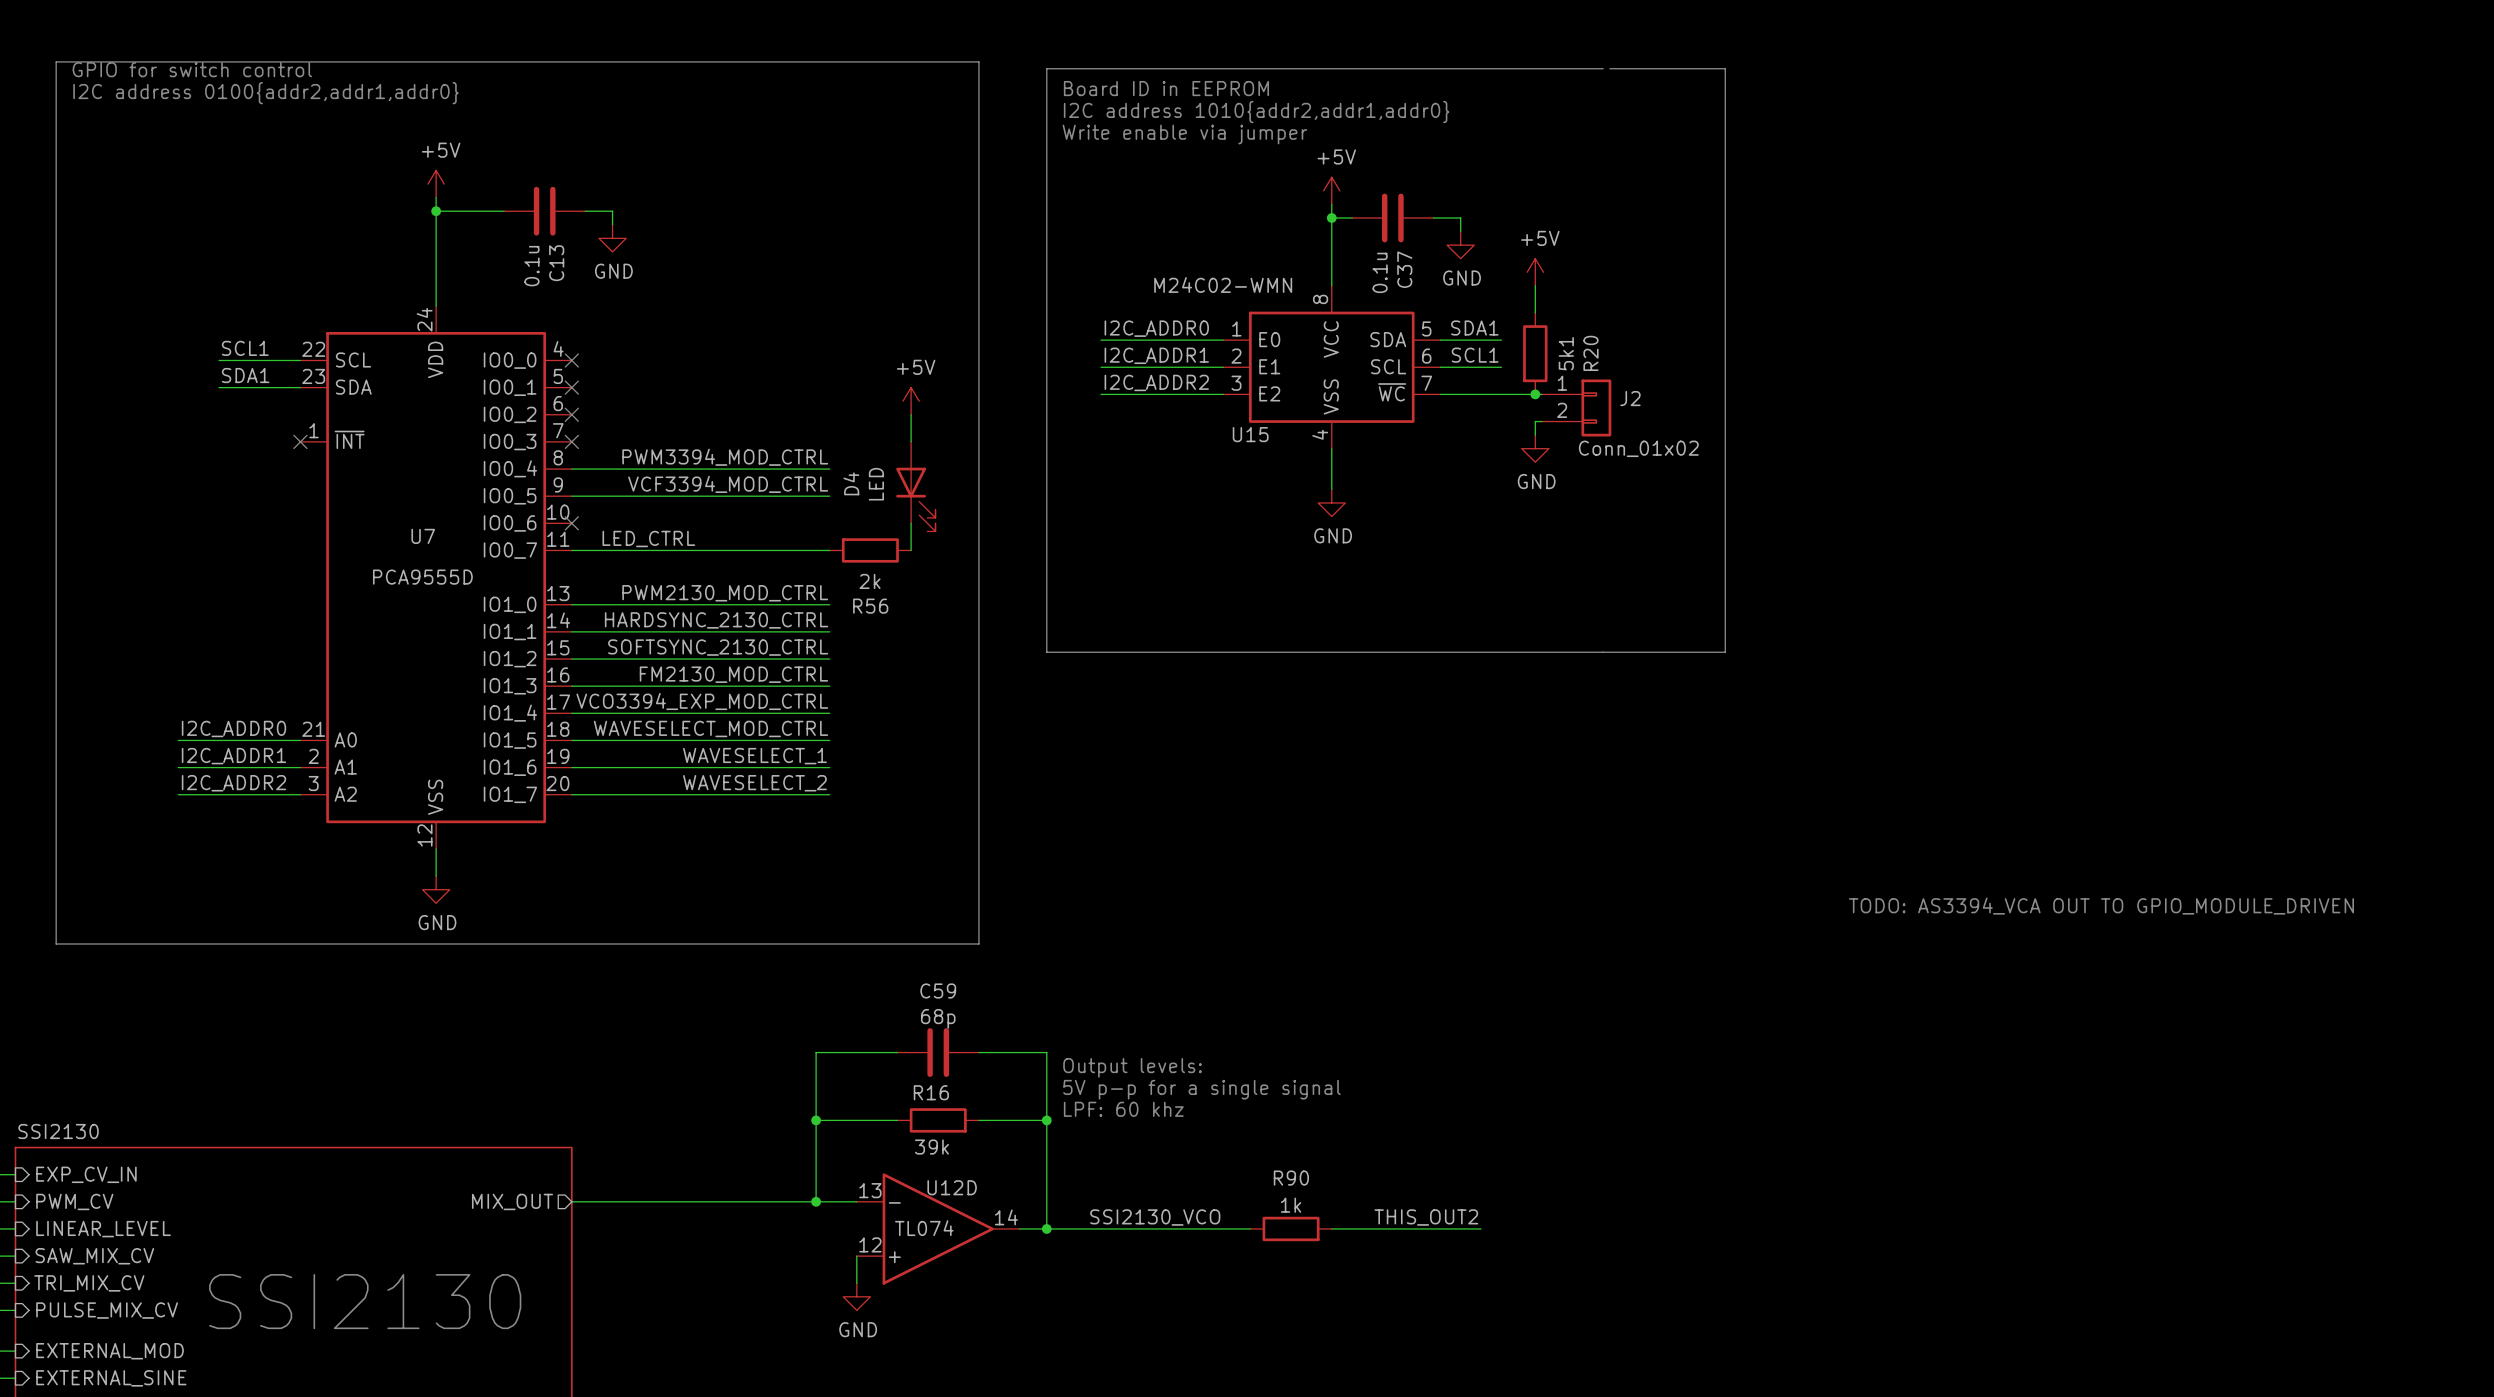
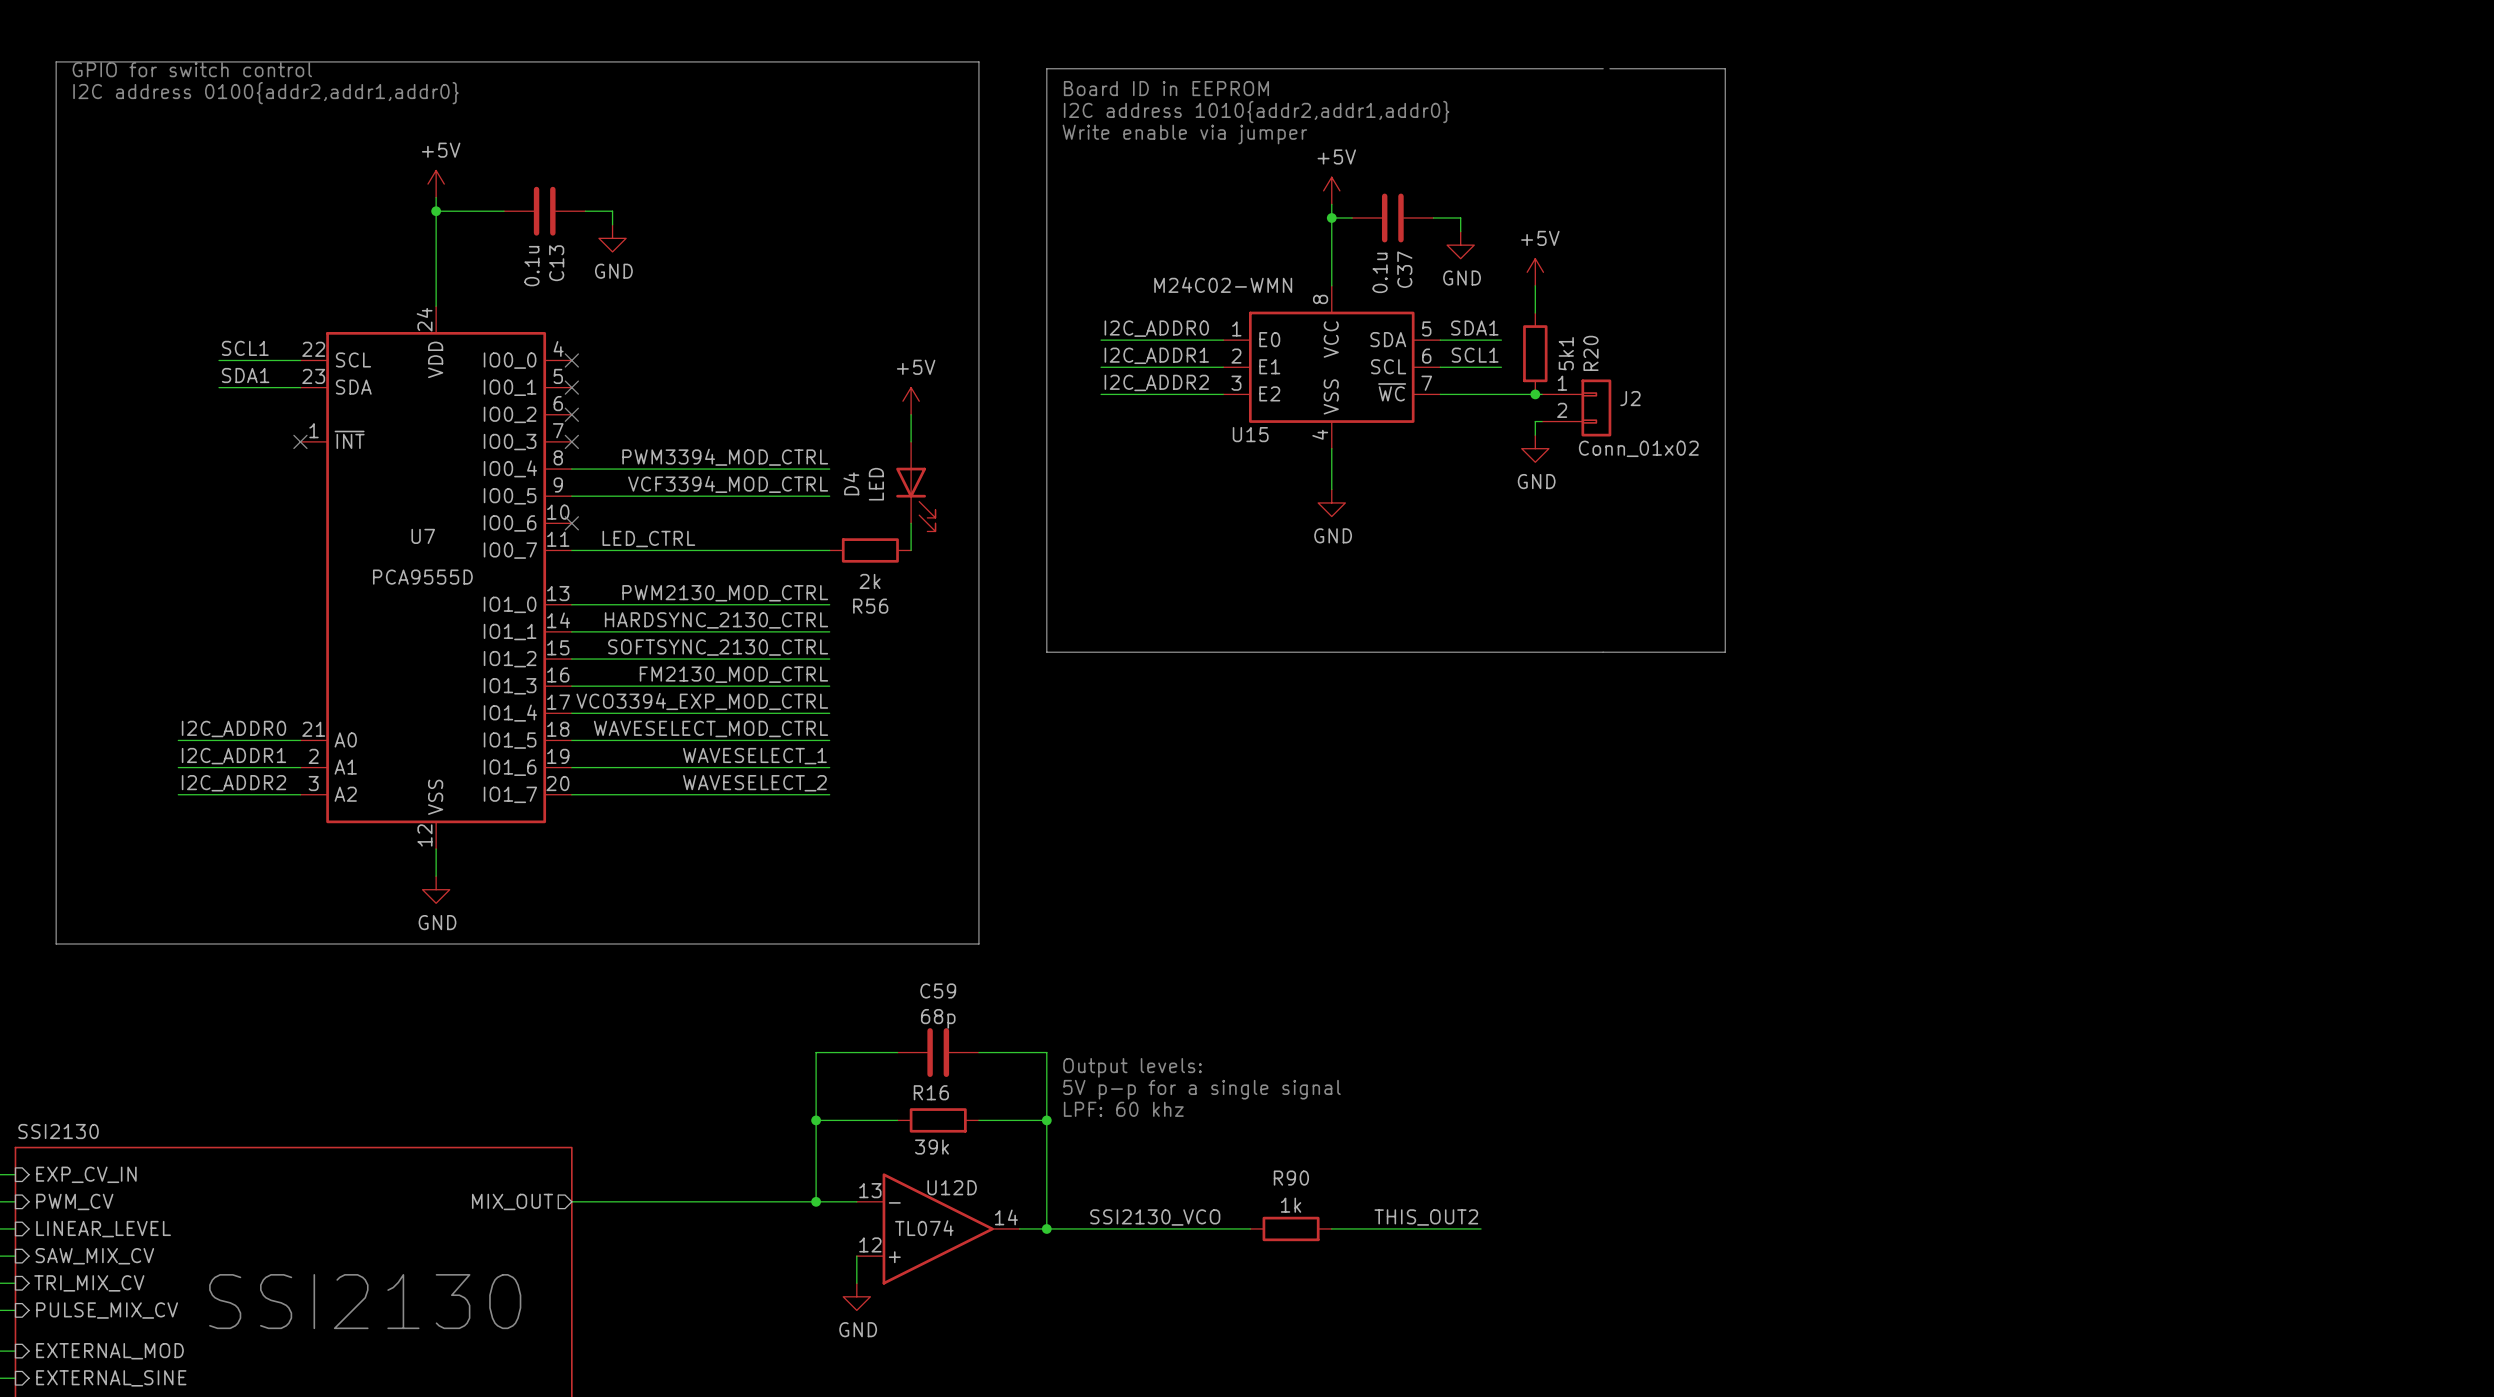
text: TODO: AS3394_VCA OUT TO GPIO_MODULE_DRIVEN (2101, 906) -> none

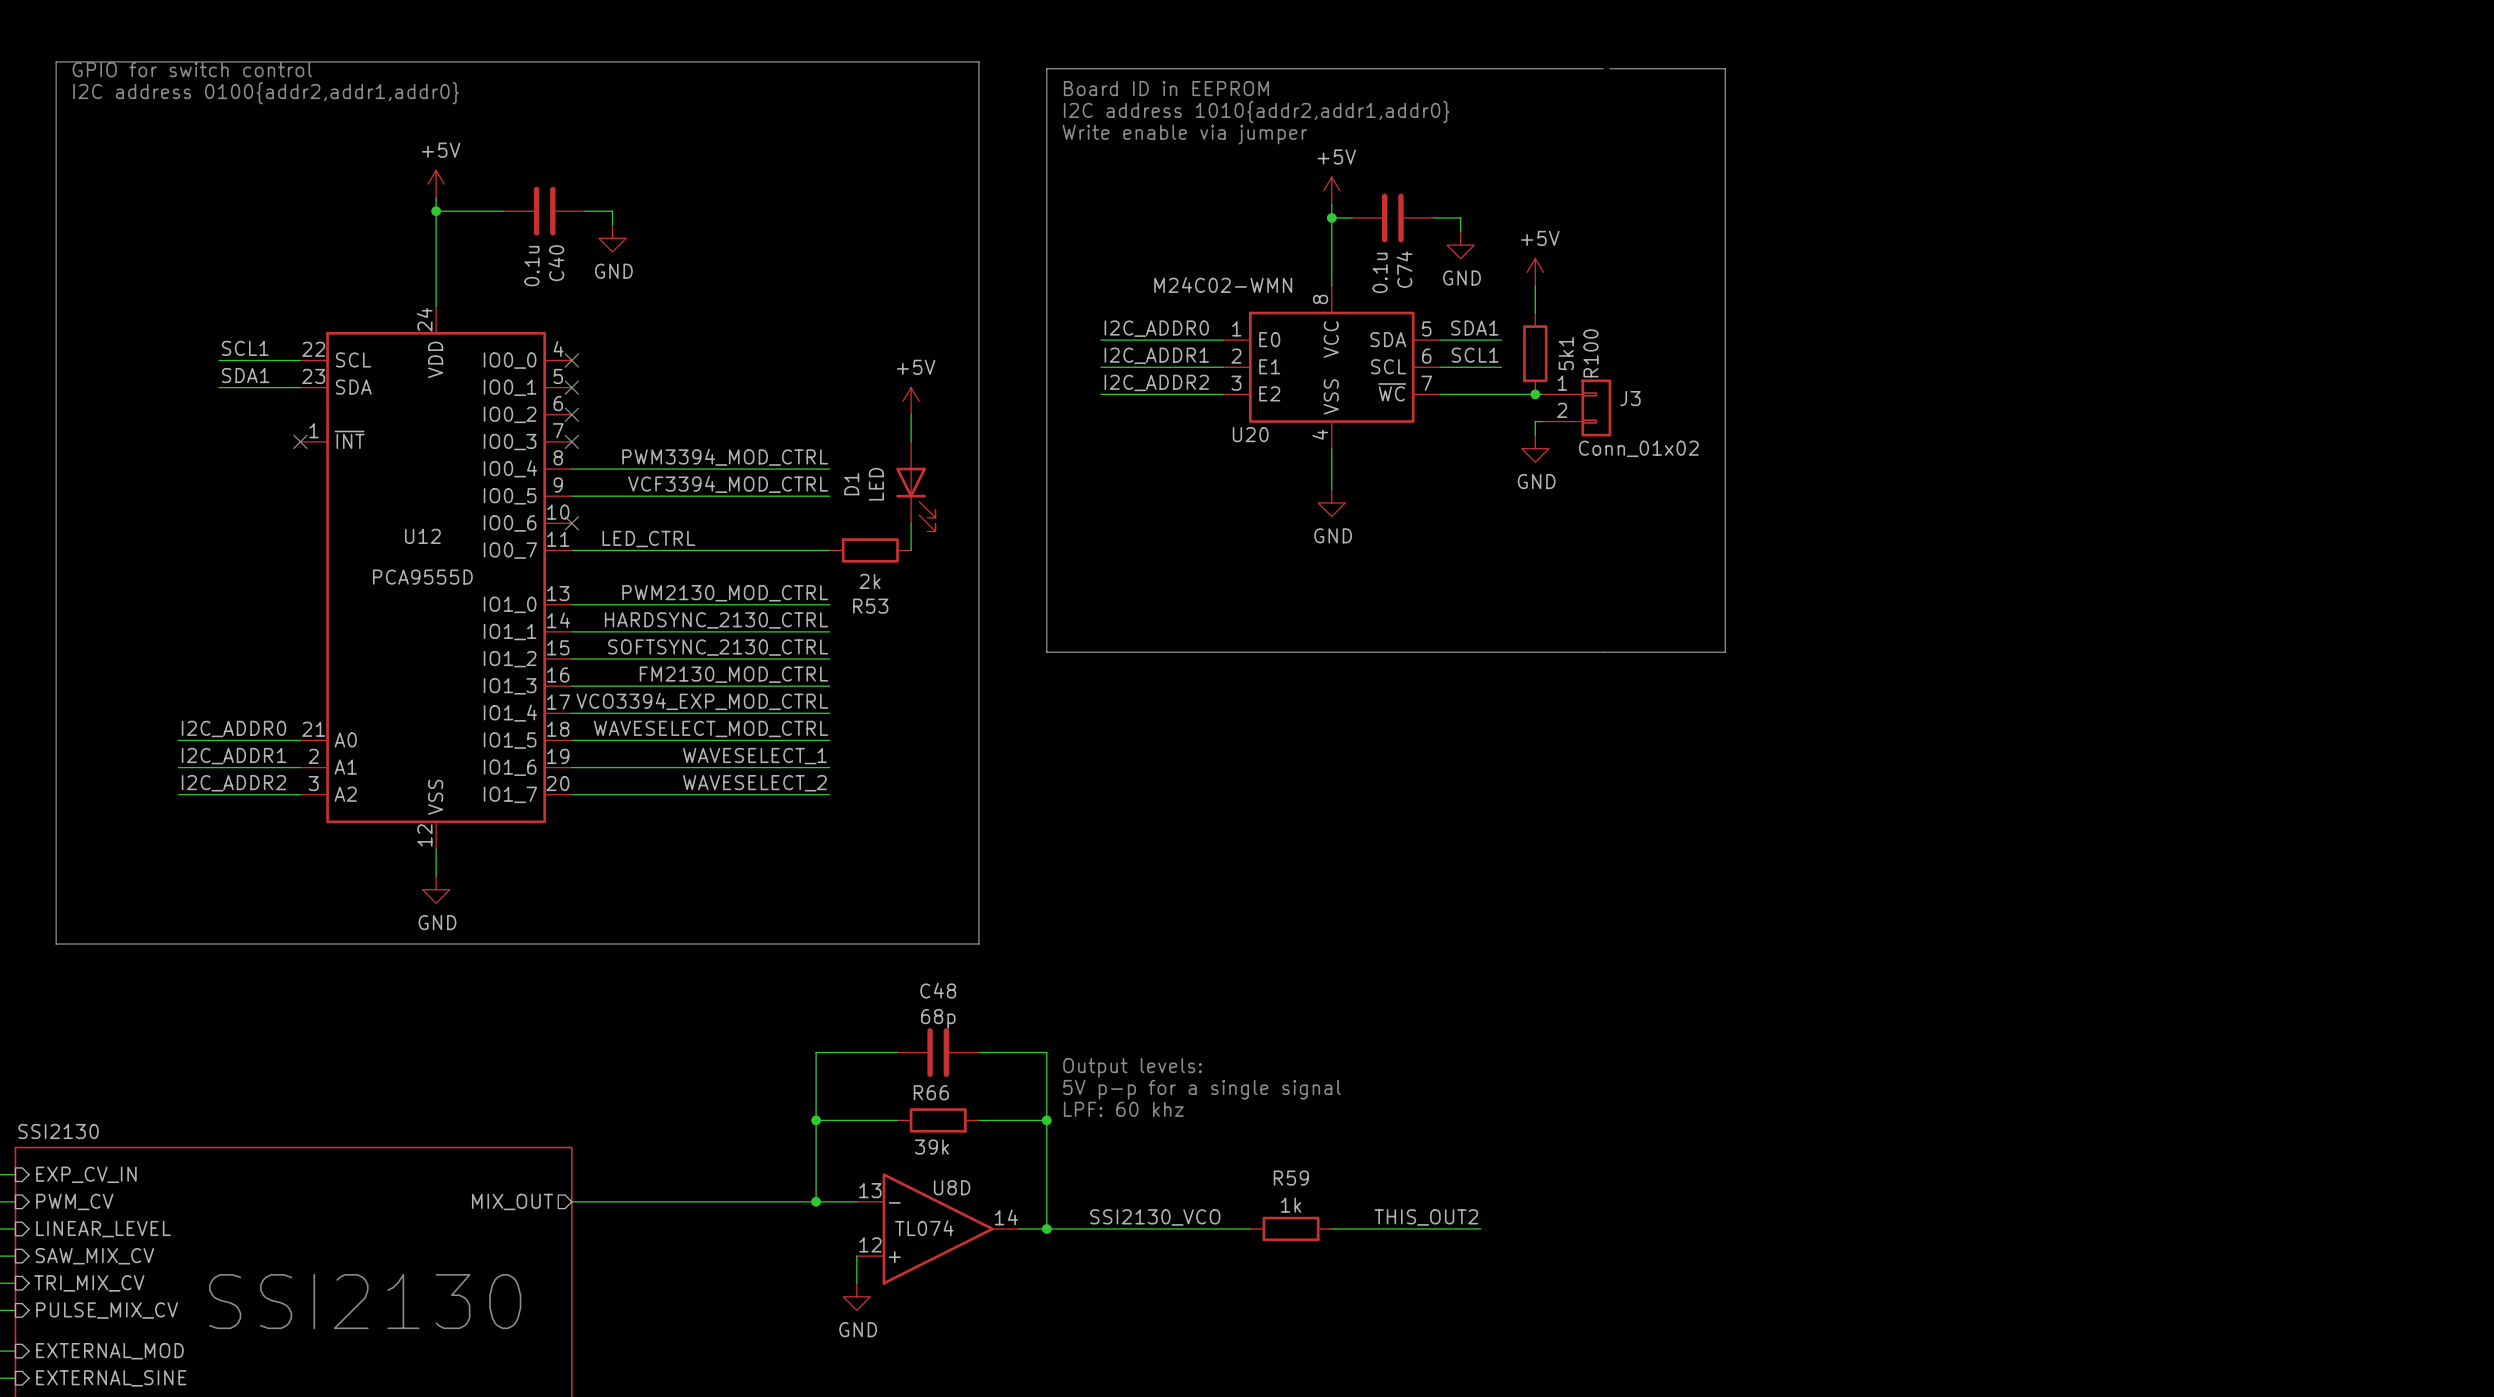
C13 name: C13 (556, 263) -> C40 (556, 263)
C37 name: C37 (1404, 269) -> C74 (1404, 269)
R20 name: R20 (1590, 353) -> R100 (1590, 353)
J2 name: J2 (1630, 398) -> J3 (1630, 398)
U15 name: U15 (1250, 434) -> U20 (1250, 434)
D4 name: D4 (851, 483) -> D1 (851, 484)
U7 name: U7 (423, 536) -> U12 (422, 536)
R56 name: R56 (870, 606) -> R53 (870, 606)
C59 name: C59 (938, 990) -> C48 (938, 990)
R16 name: R16 (931, 1092) -> R66 (931, 1092)
R90 name: R90 (1291, 1178) -> R59 (1291, 1178)
U12D name: U12D (952, 1187) -> U8D (952, 1187)

